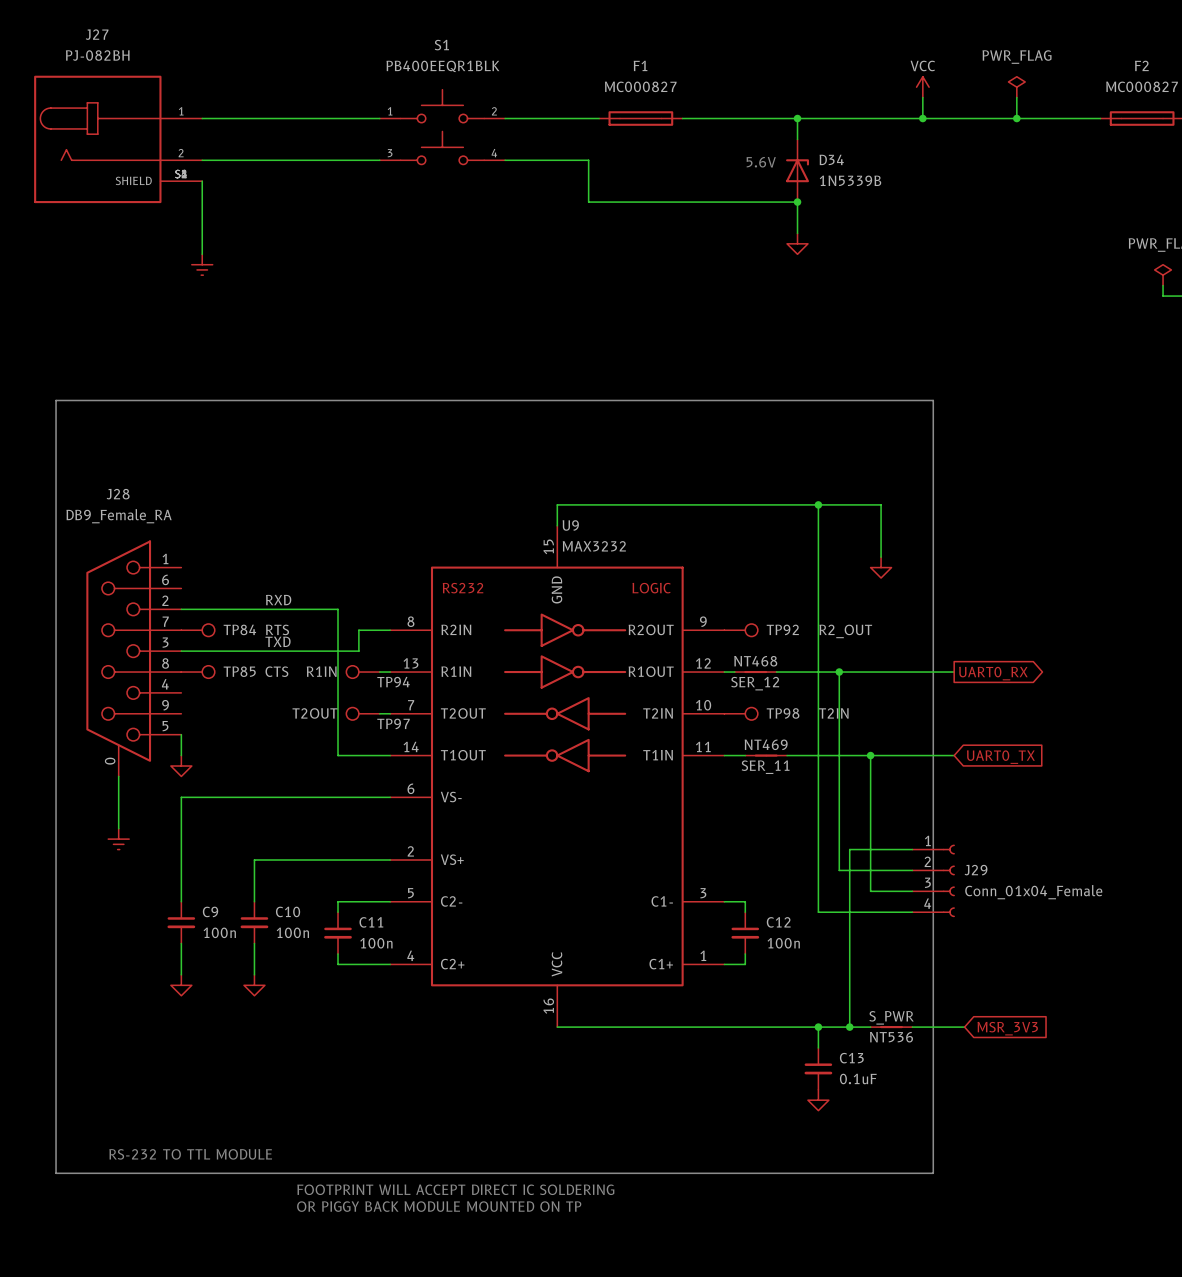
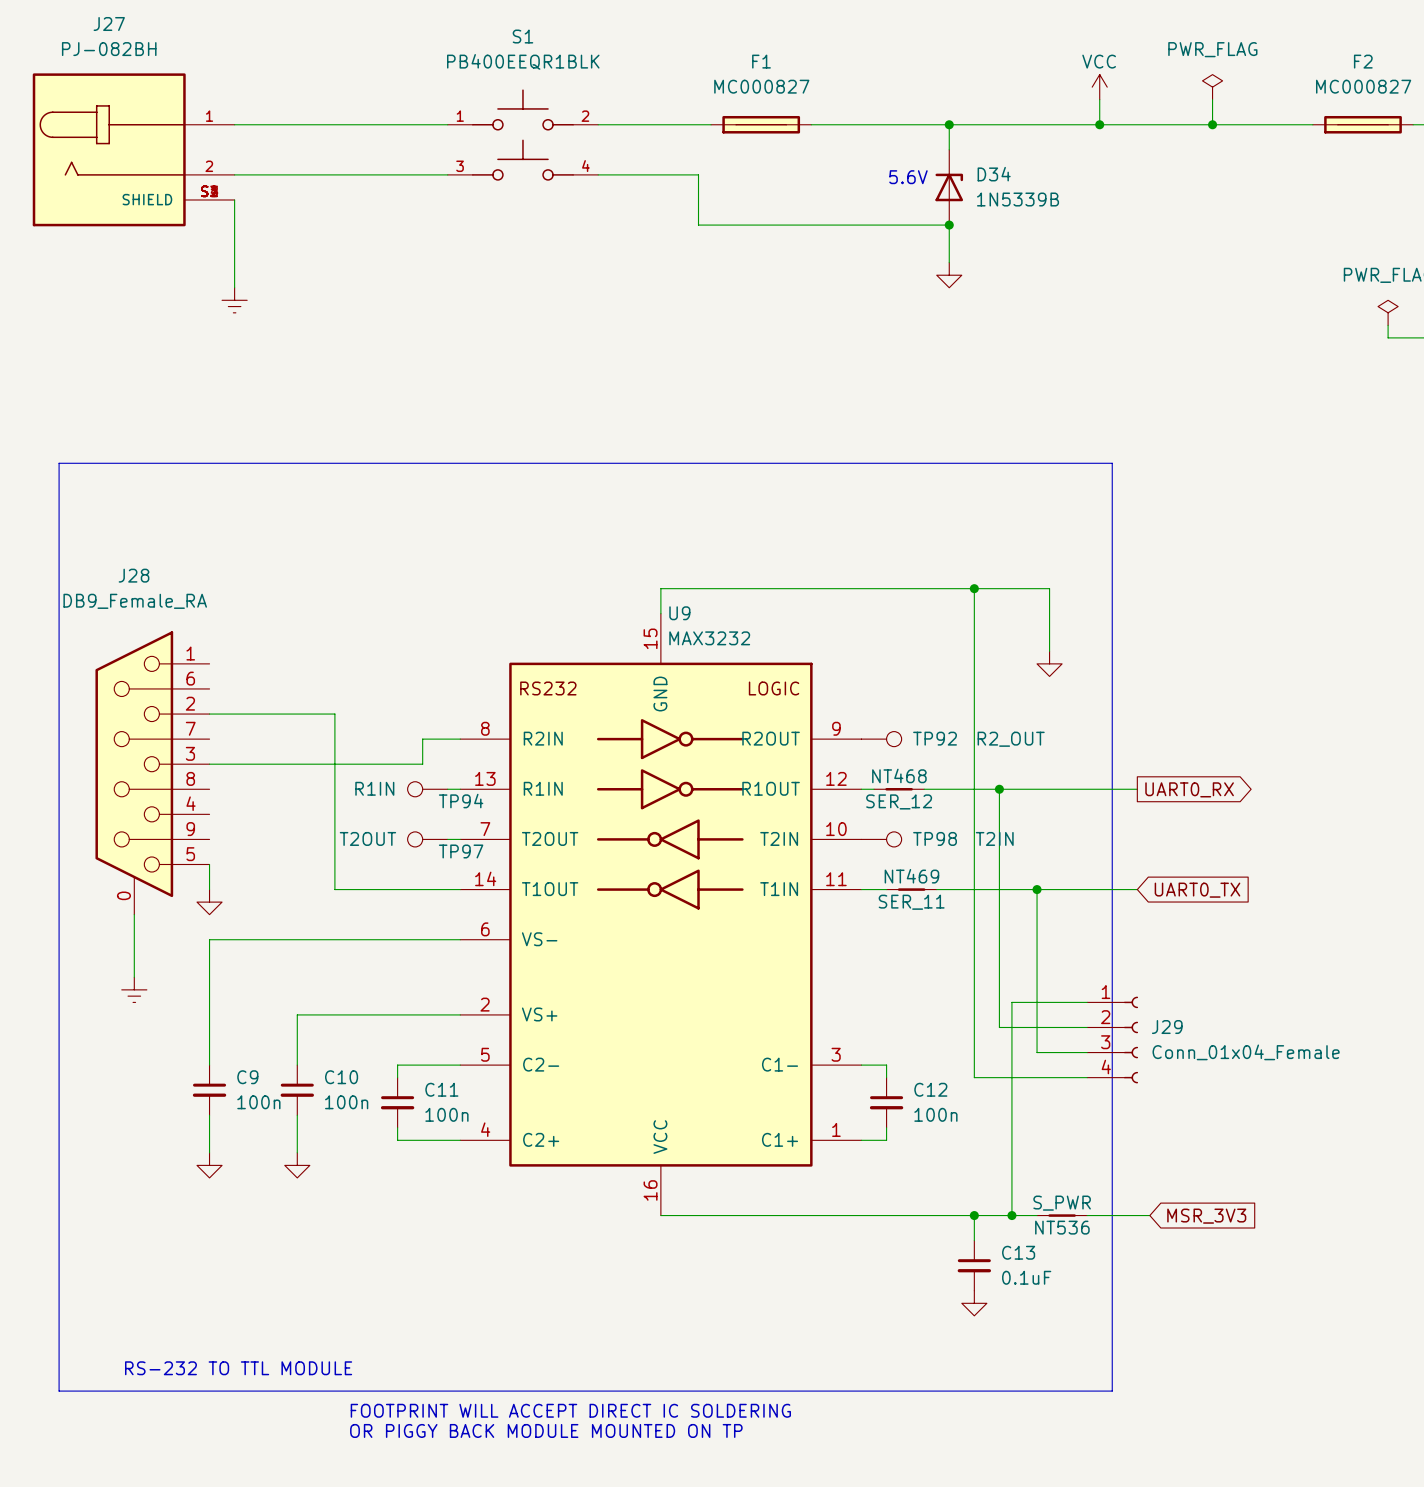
label: RXD (278, 600) -> none
wire: (285, 609) (338, 609) (338, 755) -> (334, 714) (334, 889) (397, 889)
TP84: RTS (198, 630) -> none
label: TXD (278, 641) -> none
TP85: CTS (198, 672) -> none

